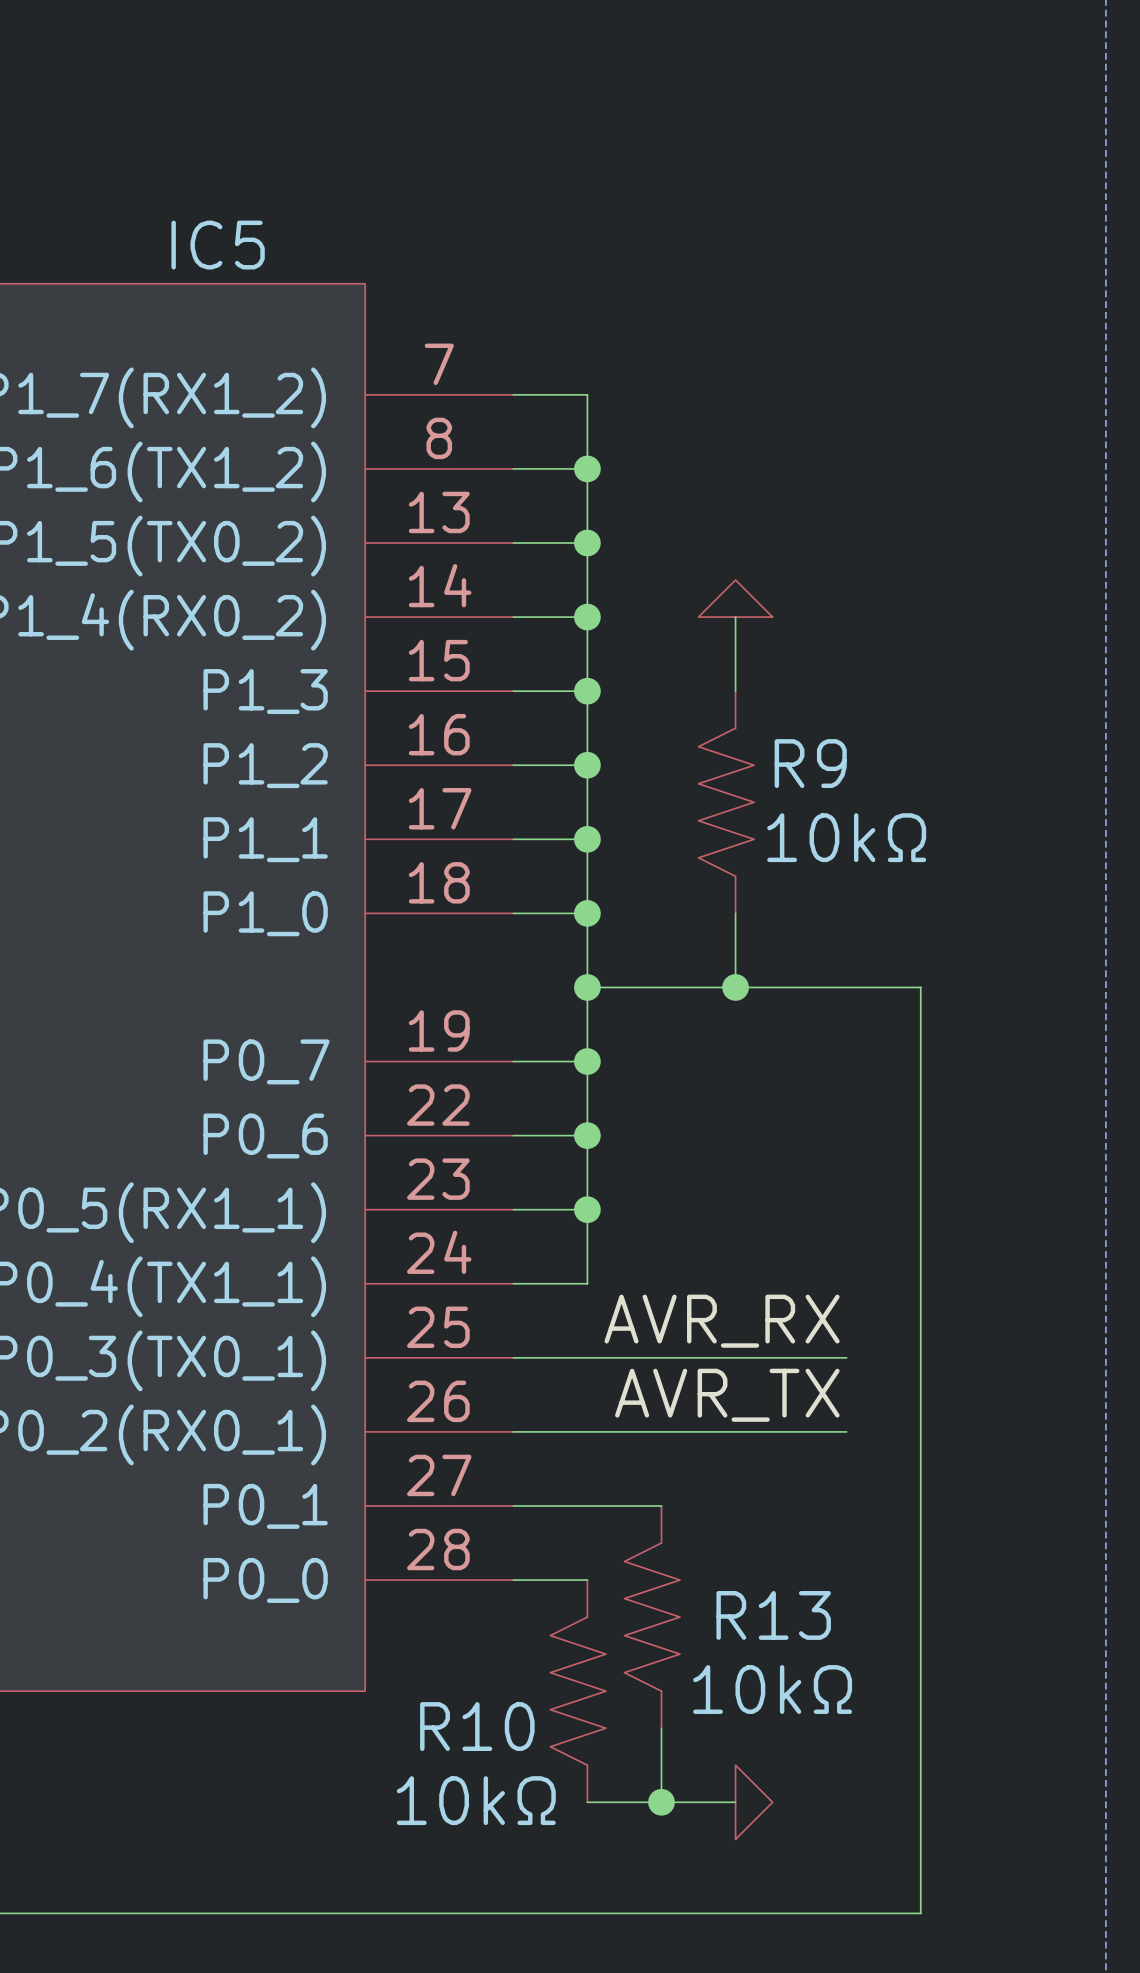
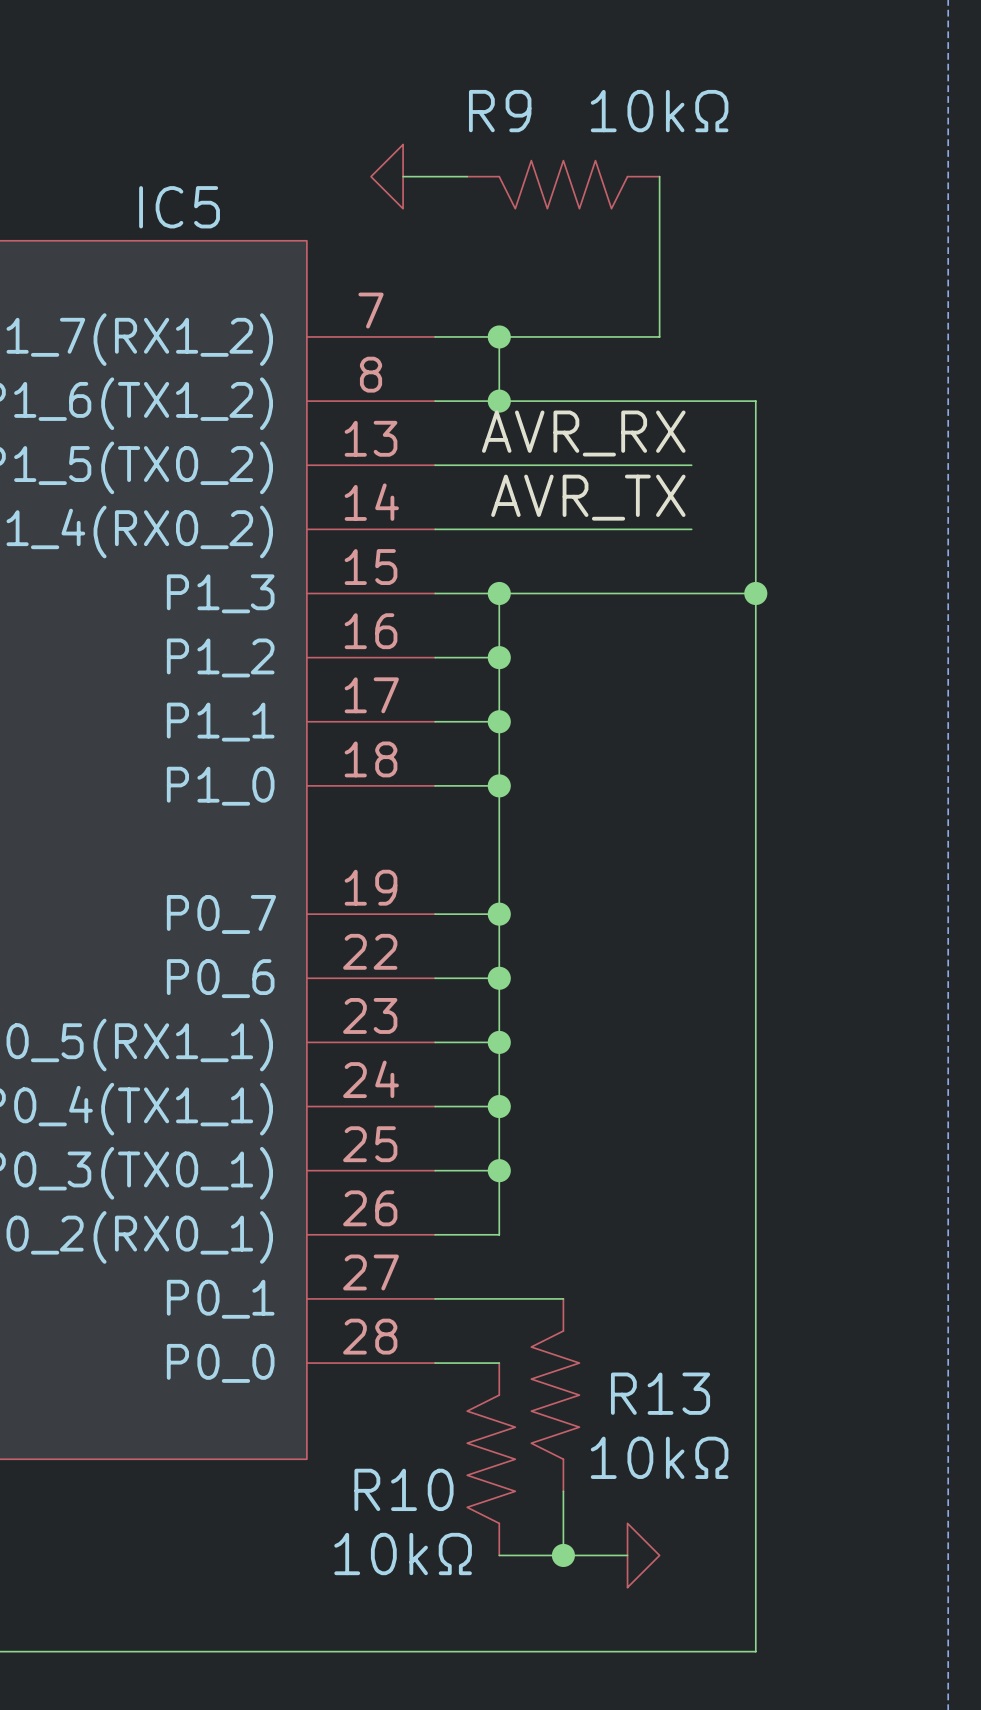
wire: none -> (403, 176) (467, 176)
wire: none -> (659, 176) (659, 336) (499, 336)
junction: none -> (499, 336)
wire: (587, 468) (587, 691) -> (755, 593) (499, 593)
label: none -> AVR_RX (583, 433)
wire: none -> (499, 465) (691, 465)
junction: (587, 543) -> none
label: none -> AVR_TX (588, 497)
power symbol rotation: 0° (735, 598) -> 90° counterclockwise (387, 176)
power symbol position: (735, 598) -> (387, 176)
wire: none -> (499, 529) (691, 529)
junction: (587, 617) -> none
wire: (735, 617) (735, 691) -> none
junction: none -> (755, 593)
R9 rotation: 0° (726, 802) -> 90° counterclockwise (563, 184)
R9 position: (726, 802) -> (563, 184)
R9 value position: 10kΩ (846, 837) -> 10kΩ (659, 111)
wire: (735, 913) (735, 987) -> none
wire: (587, 987) (920, 987) (920, 1913) (883, 1913) -> (499, 401) (755, 401) (755, 1651)
junction: (587, 987) -> none
junction: (735, 987) -> none
junction: none -> (499, 1106)
label: AVR_RX (722, 1321) -> none
wire: (587, 1357) (846, 1357) -> none
junction: none -> (499, 1170)
label: AVR_TX (727, 1395) -> none
wire: (587, 1431) (846, 1431) -> (499, 1234) (499, 1106)

